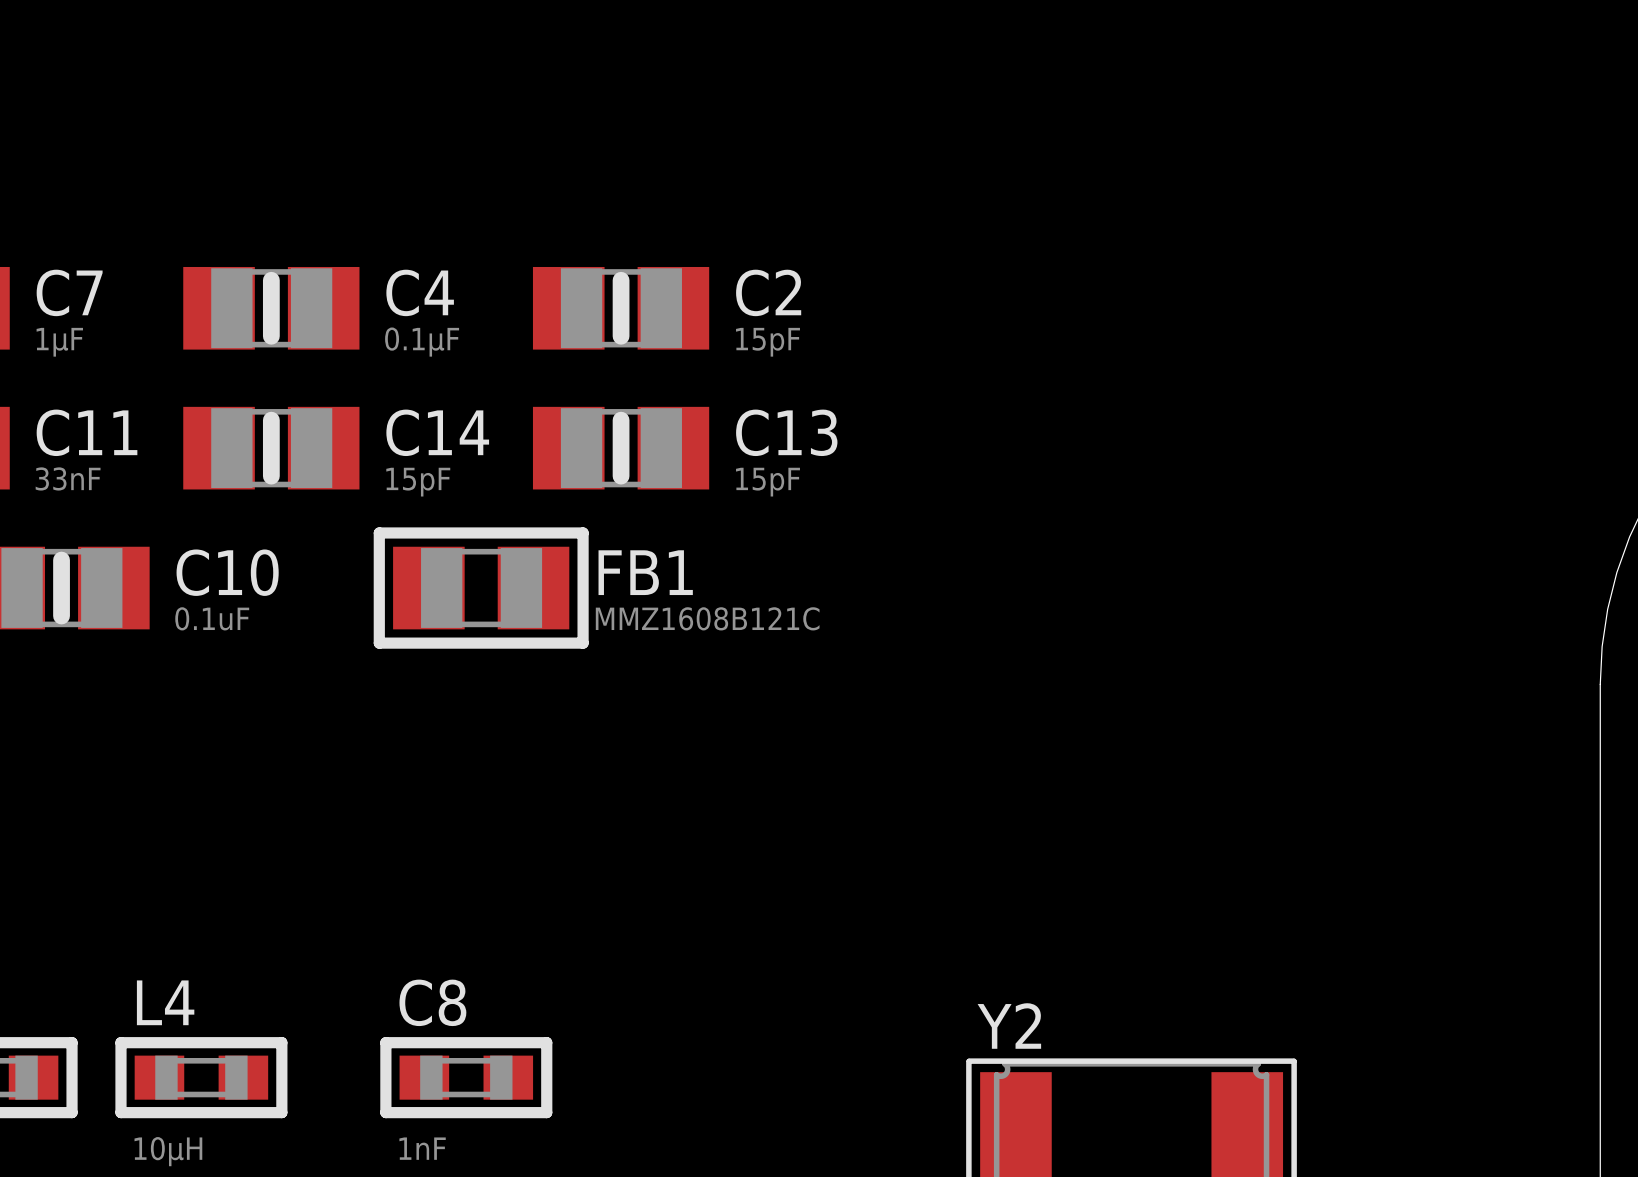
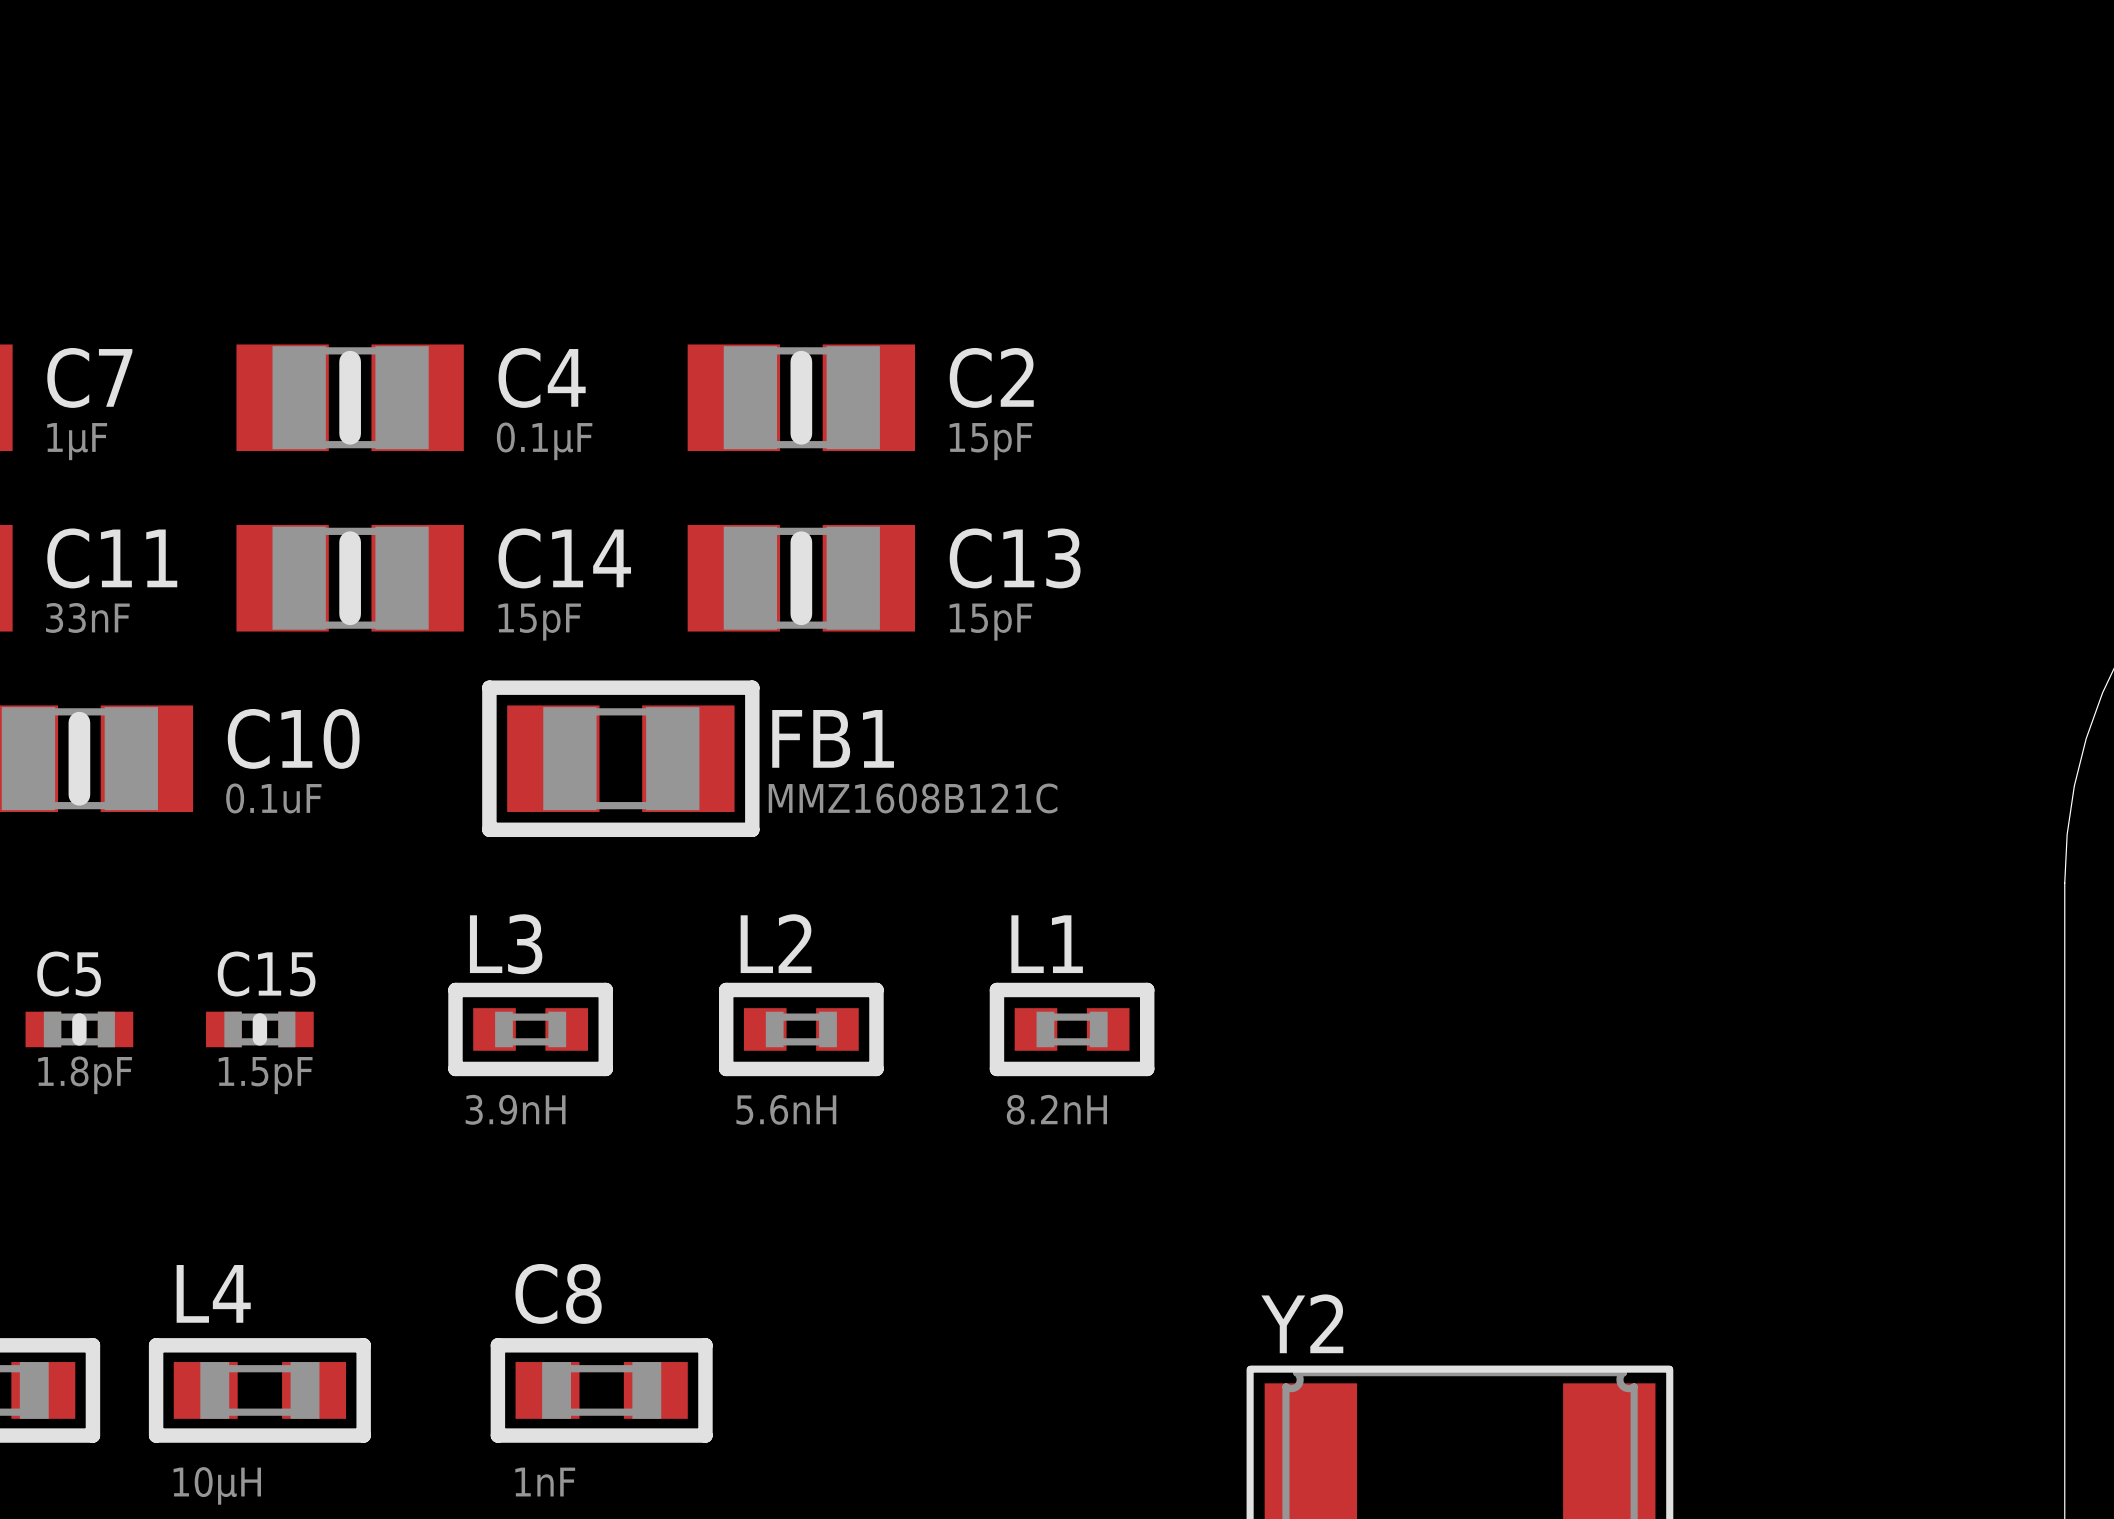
C5: none -> 1.8pF (79, 1029)
C15: none -> 1.5pF (259, 1029)
L3: none -> 3.9nH (530, 1029)
L2: none -> 5.6nH (801, 1029)
L1: none -> 8.2nH (1072, 1029)

